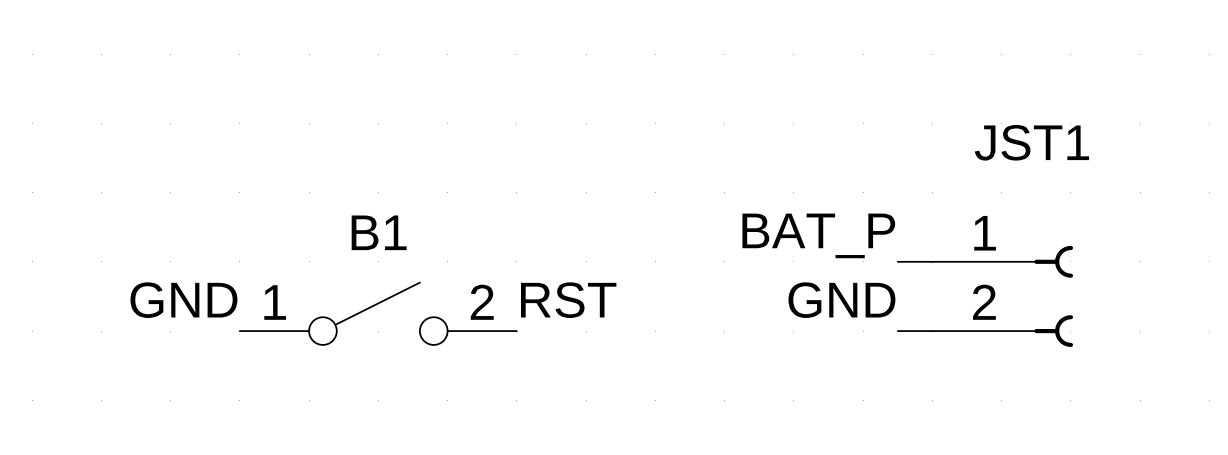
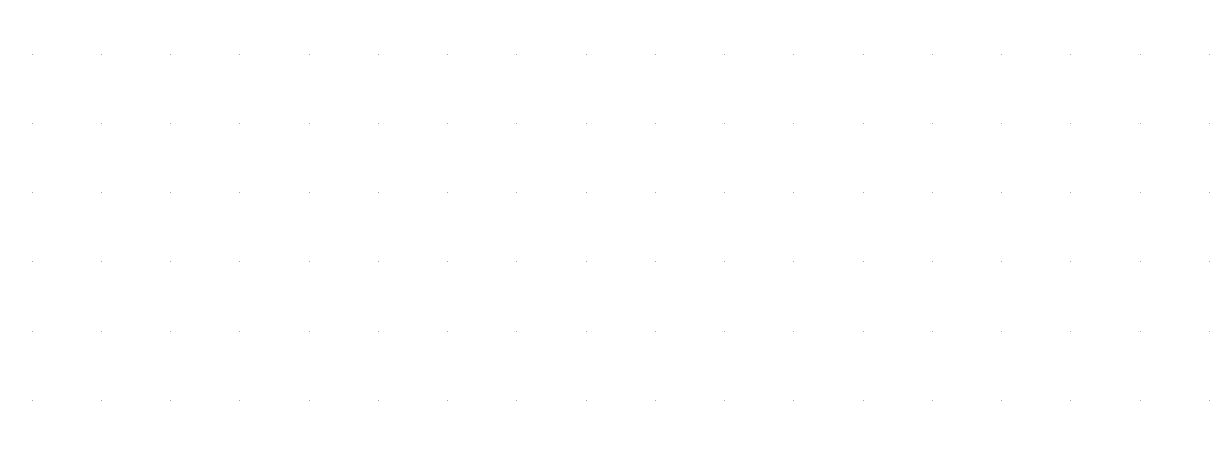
label: BAT_P (818, 235) -> none
wire: (897, 261) (932, 261) -> none
JST1: (1002, 296) -> none
label: GND (183, 300) -> none
label: RST (568, 300) -> none
label: GND (841, 300) -> none
B1: (378, 313) -> none
wire: (897, 331) (932, 331) -> none

